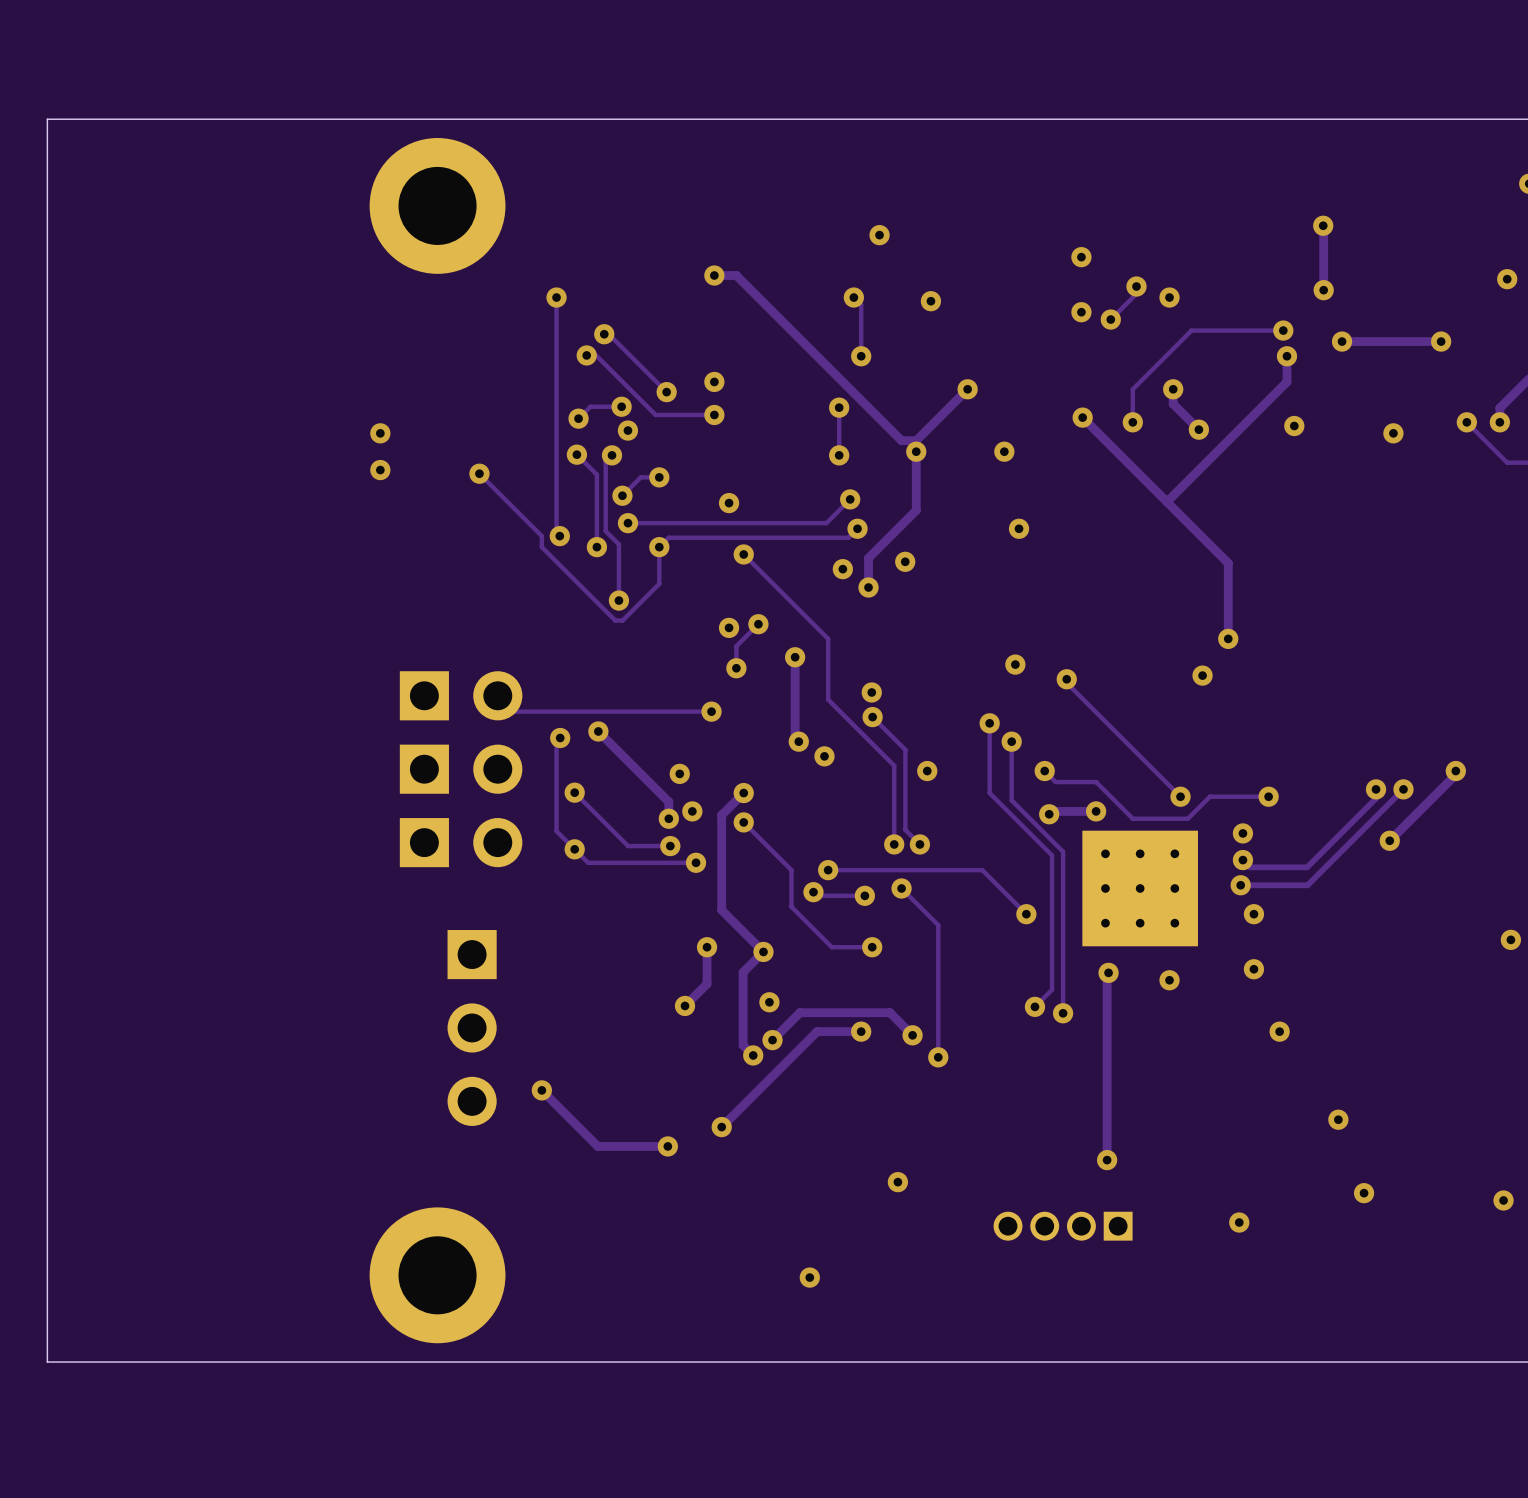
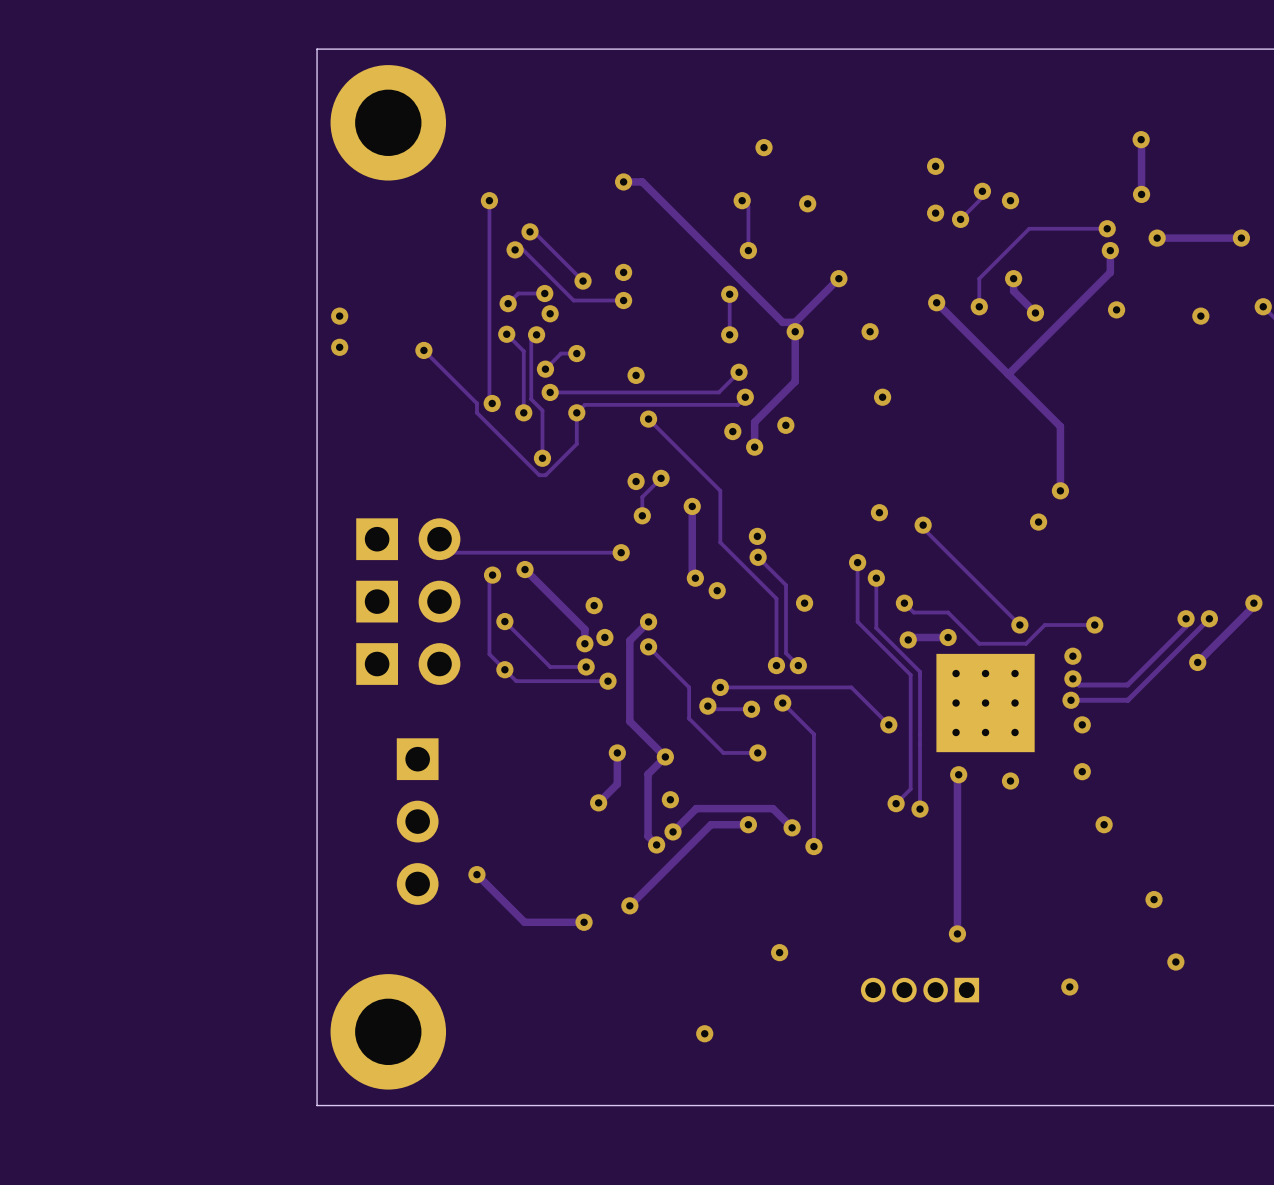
board edge: (353, 119) (47, 119) (47, 1362) (353, 1362) -> (317, 49) (317, 1105)

